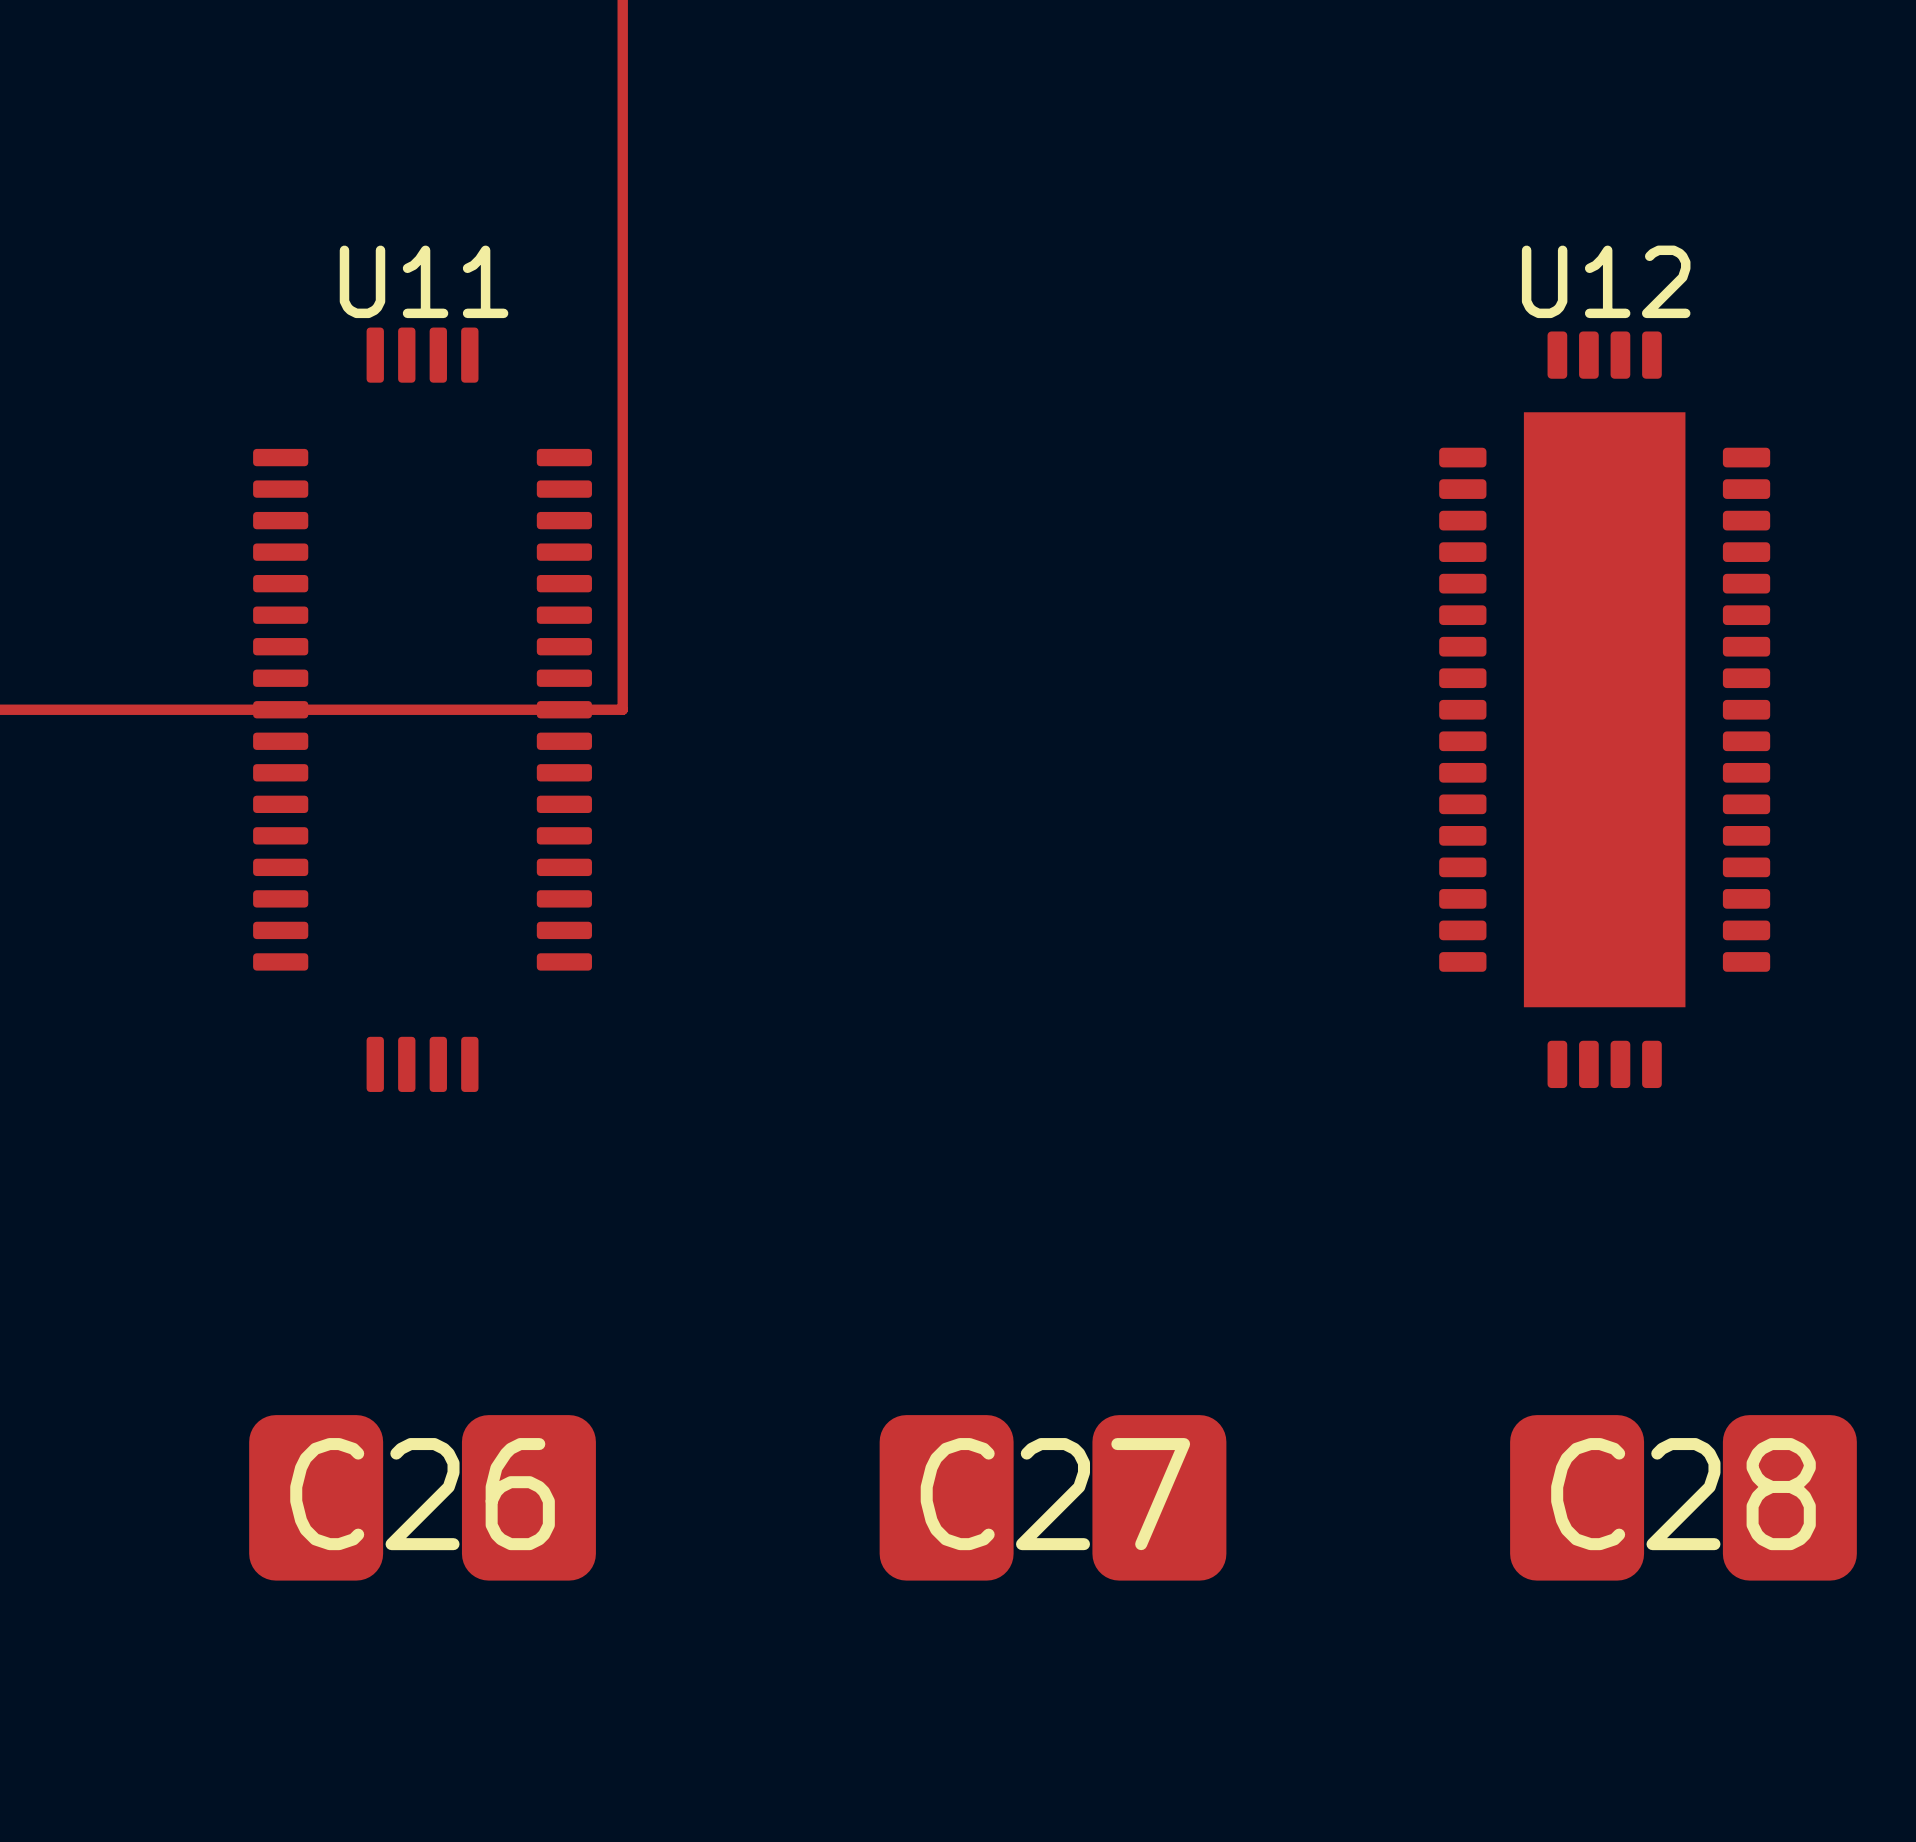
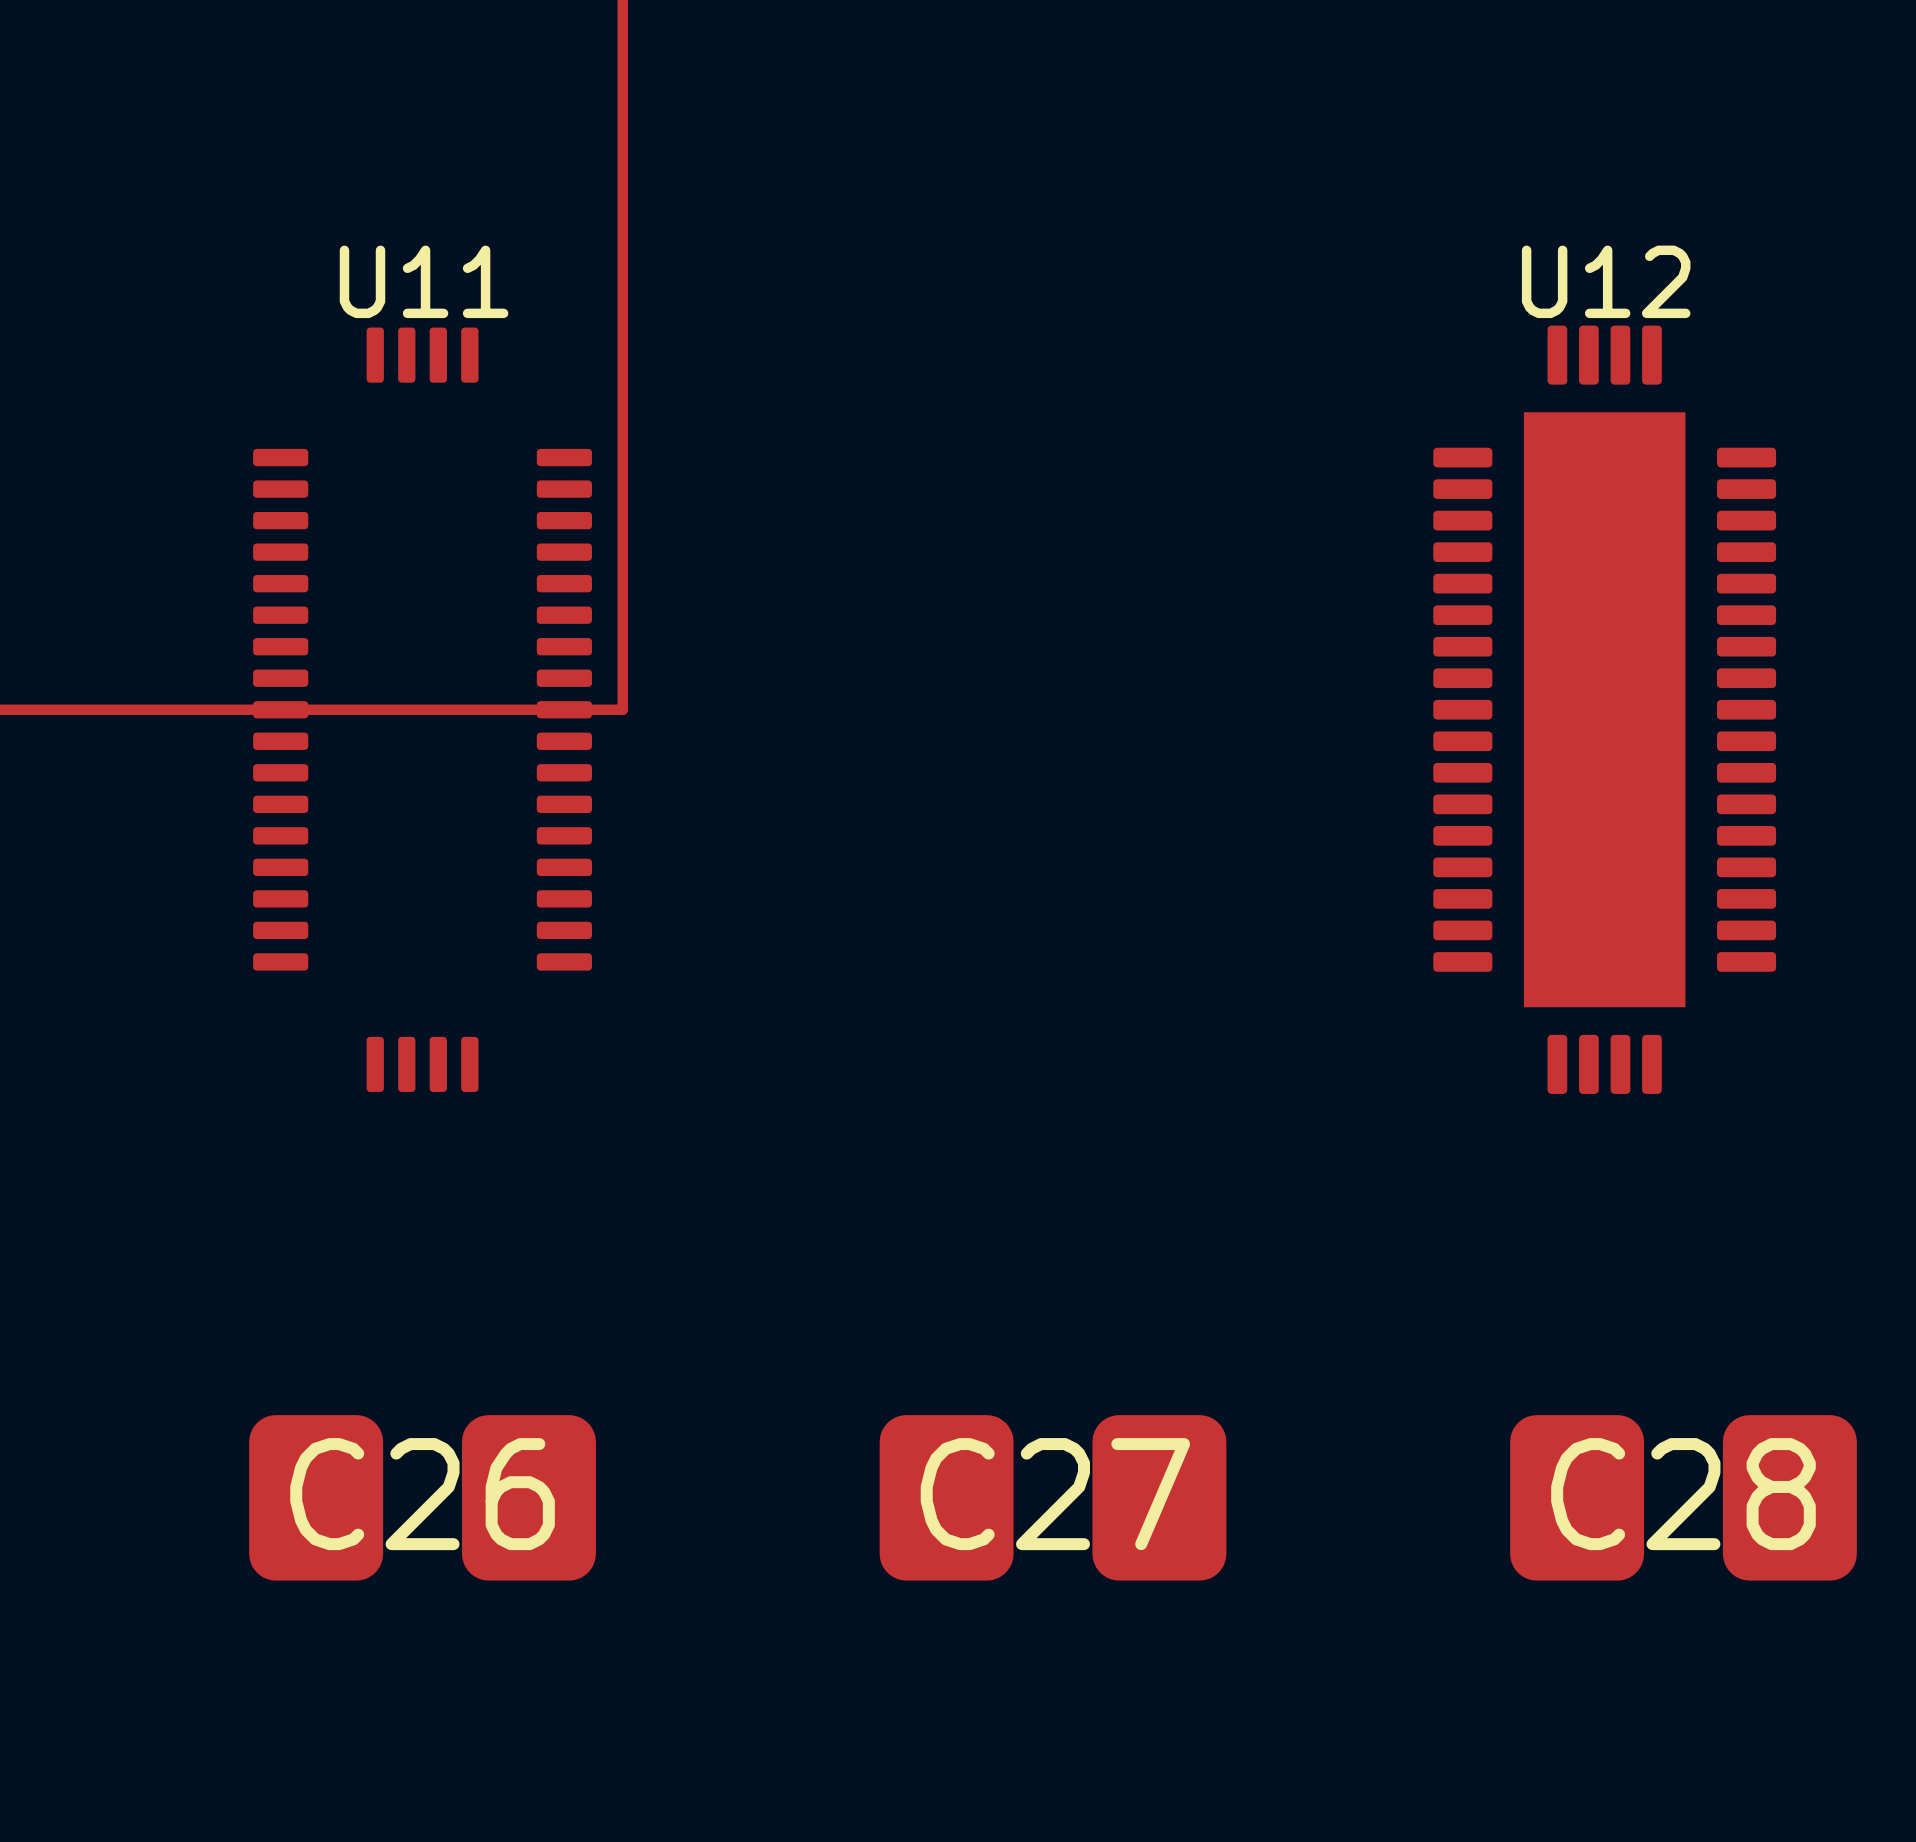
U12 footprint: [1439, 331, 1771, 1089] -> [1433, 325, 1777, 1094]

